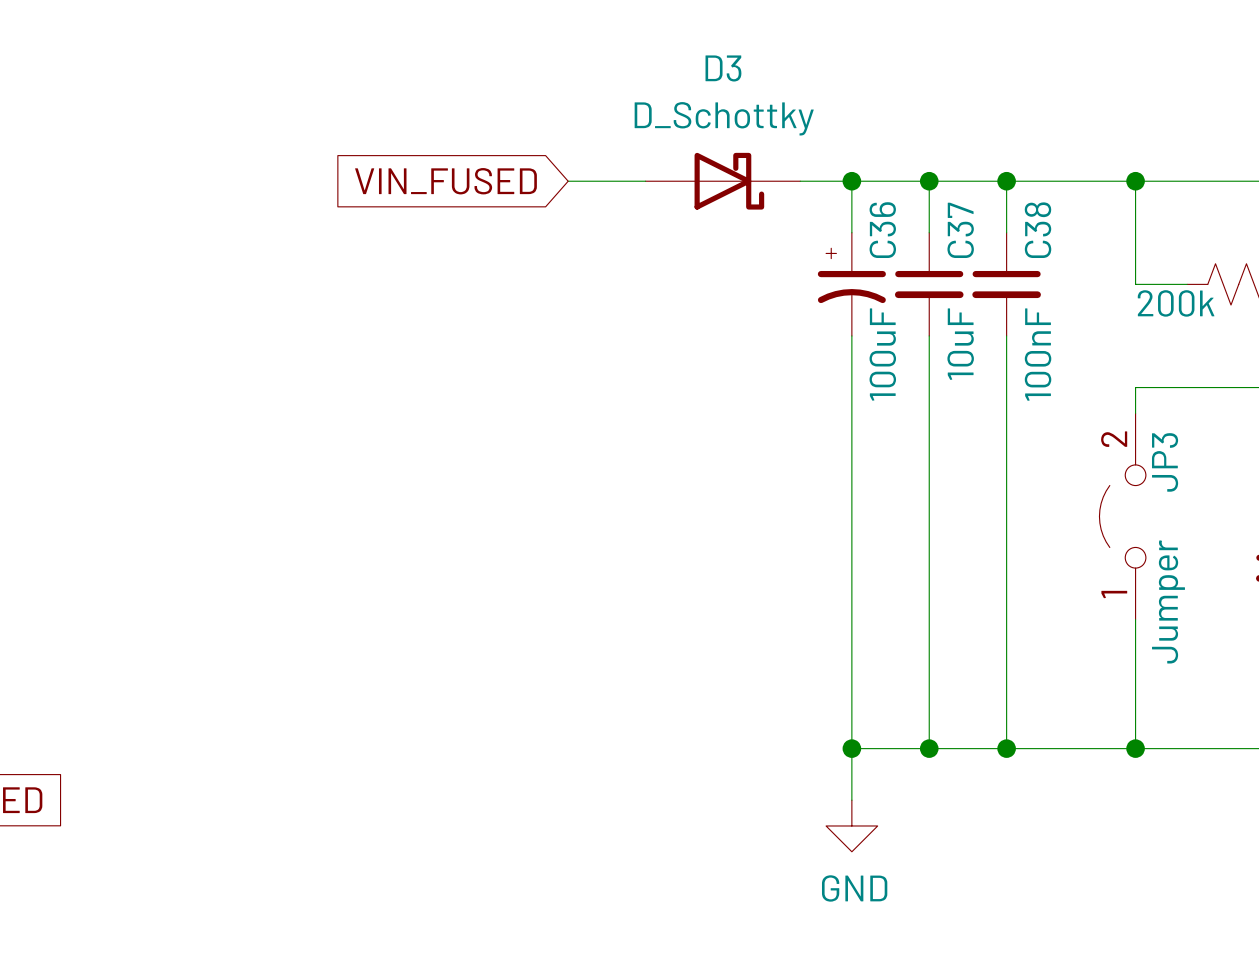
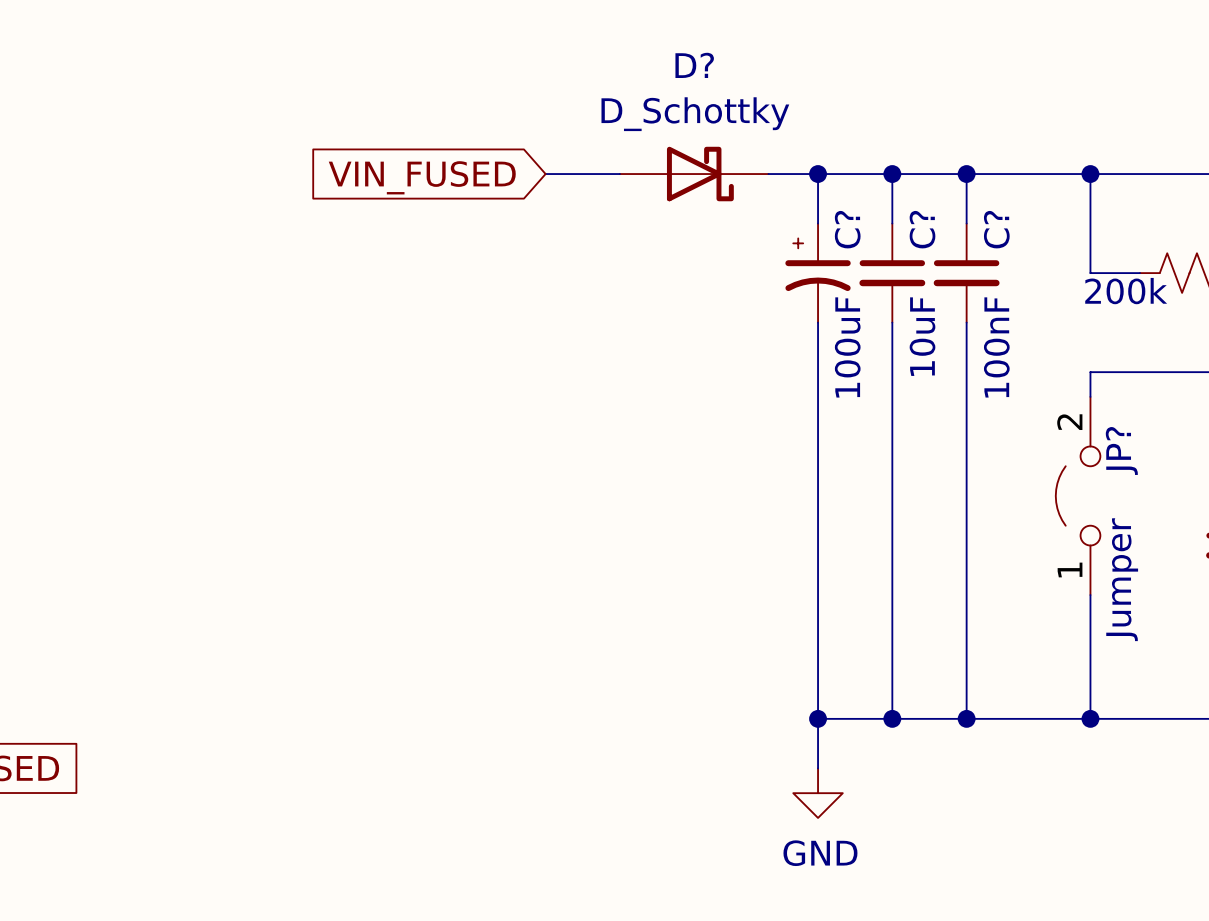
D3 name: D3 (723, 68) -> D? (694, 65)
C36 name: C36 (882, 230) -> C? (847, 229)
C37 name: C37 (960, 230) -> C? (922, 229)
C38 name: C38 (1038, 230) -> C? (996, 229)
JP3 name: JP3 (1165, 462) -> JP? (1121, 451)

